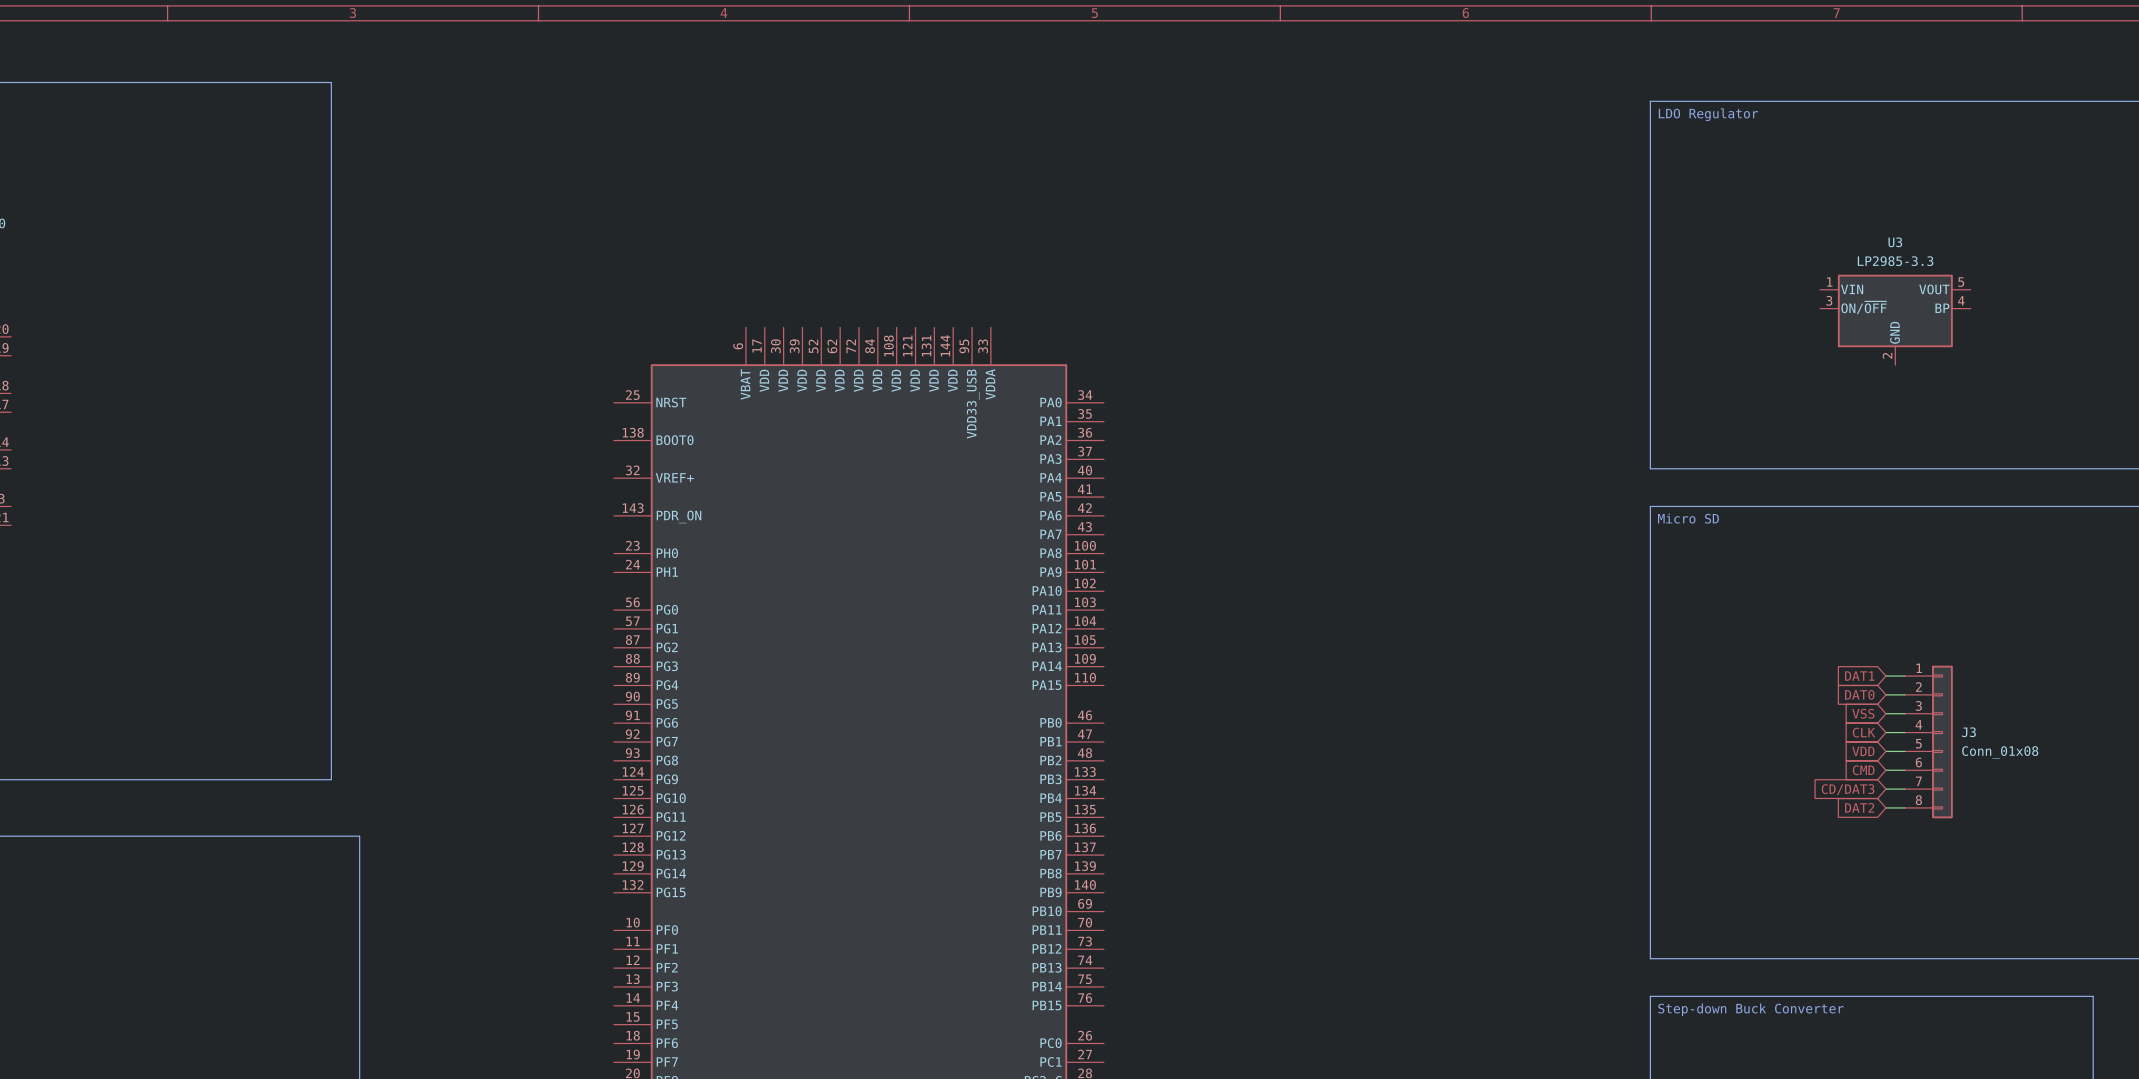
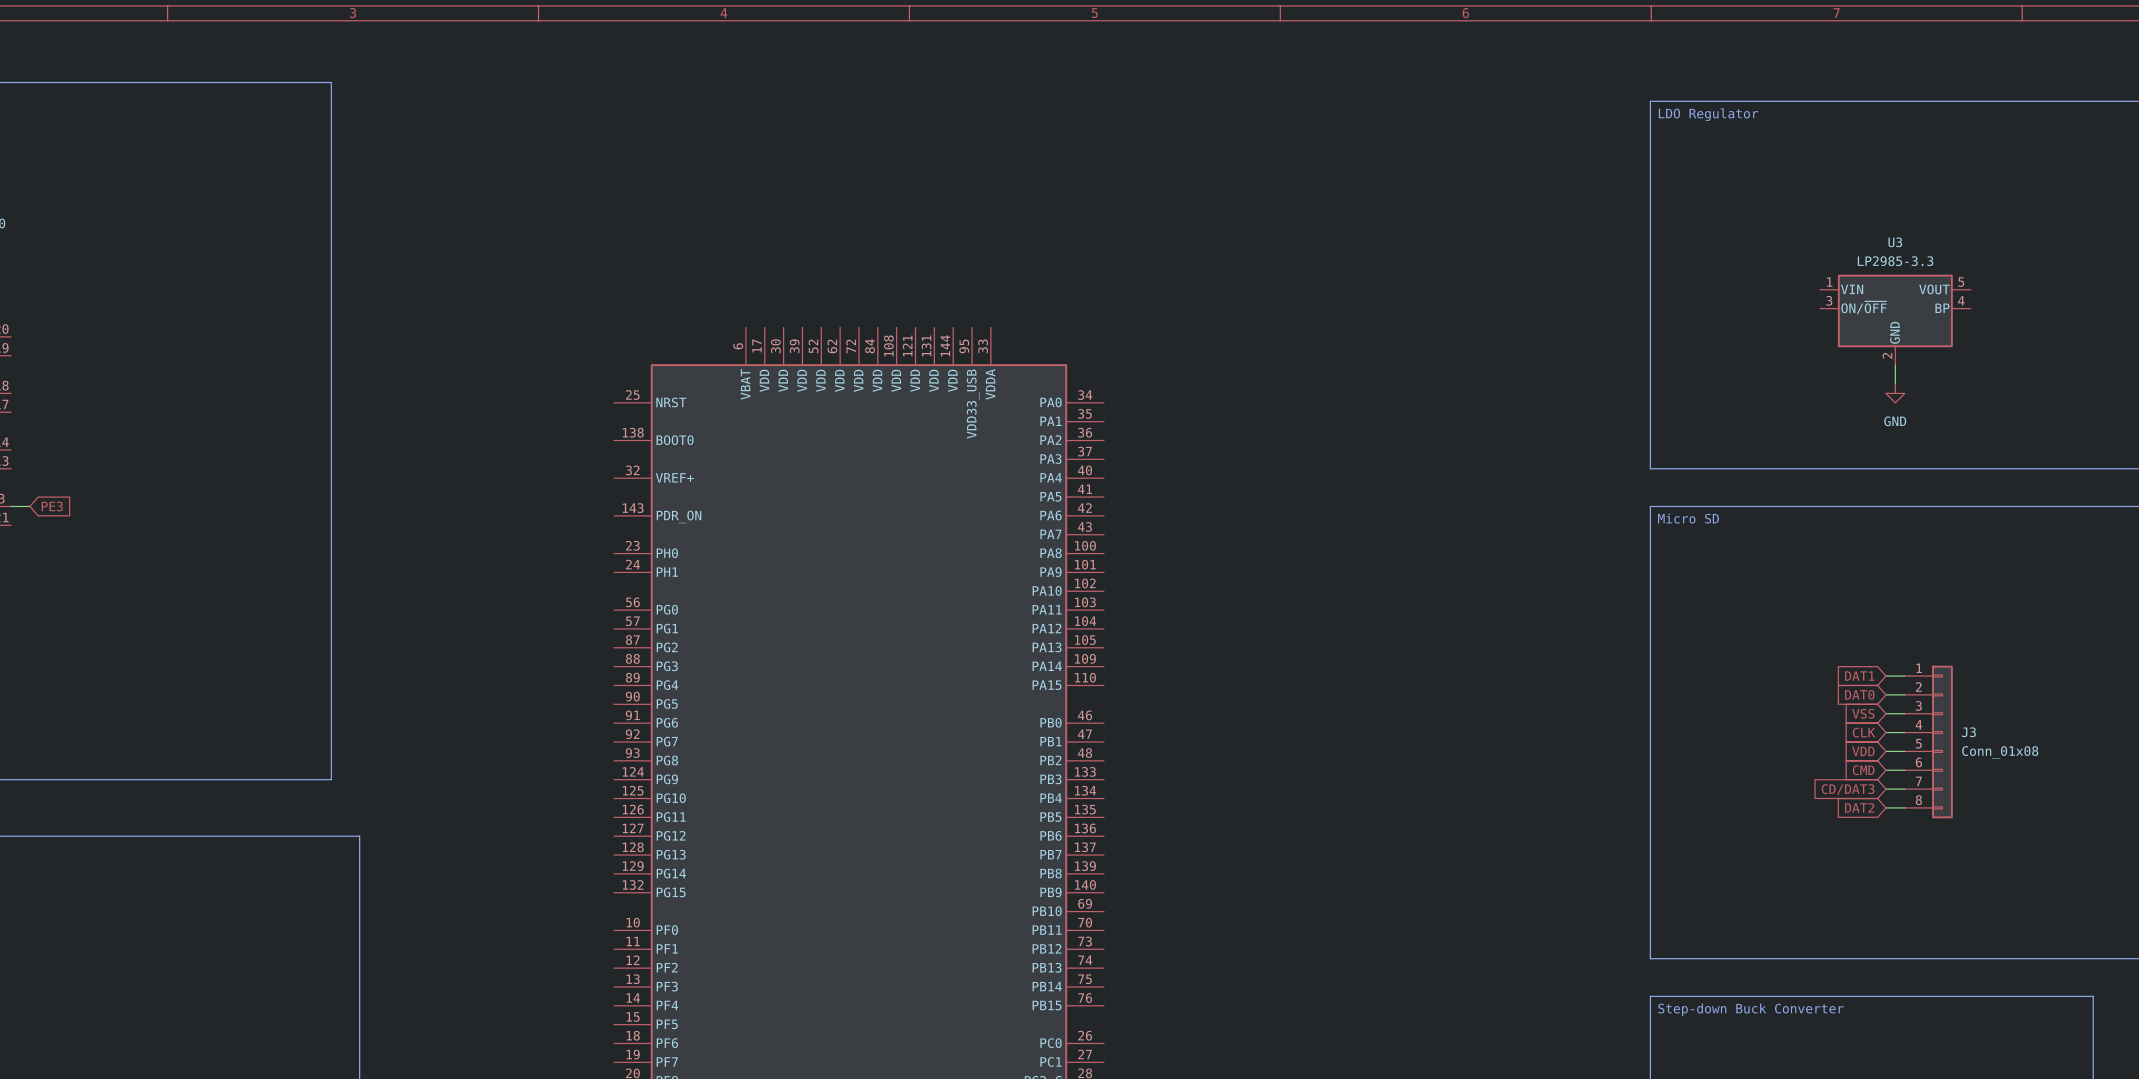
wire: none -> (1895, 365) (1895, 383)
power symbol: none -> GND (1895, 393)
wire: none -> (11, 506) (29, 506)
global label: none -> PE3 (52, 506)

